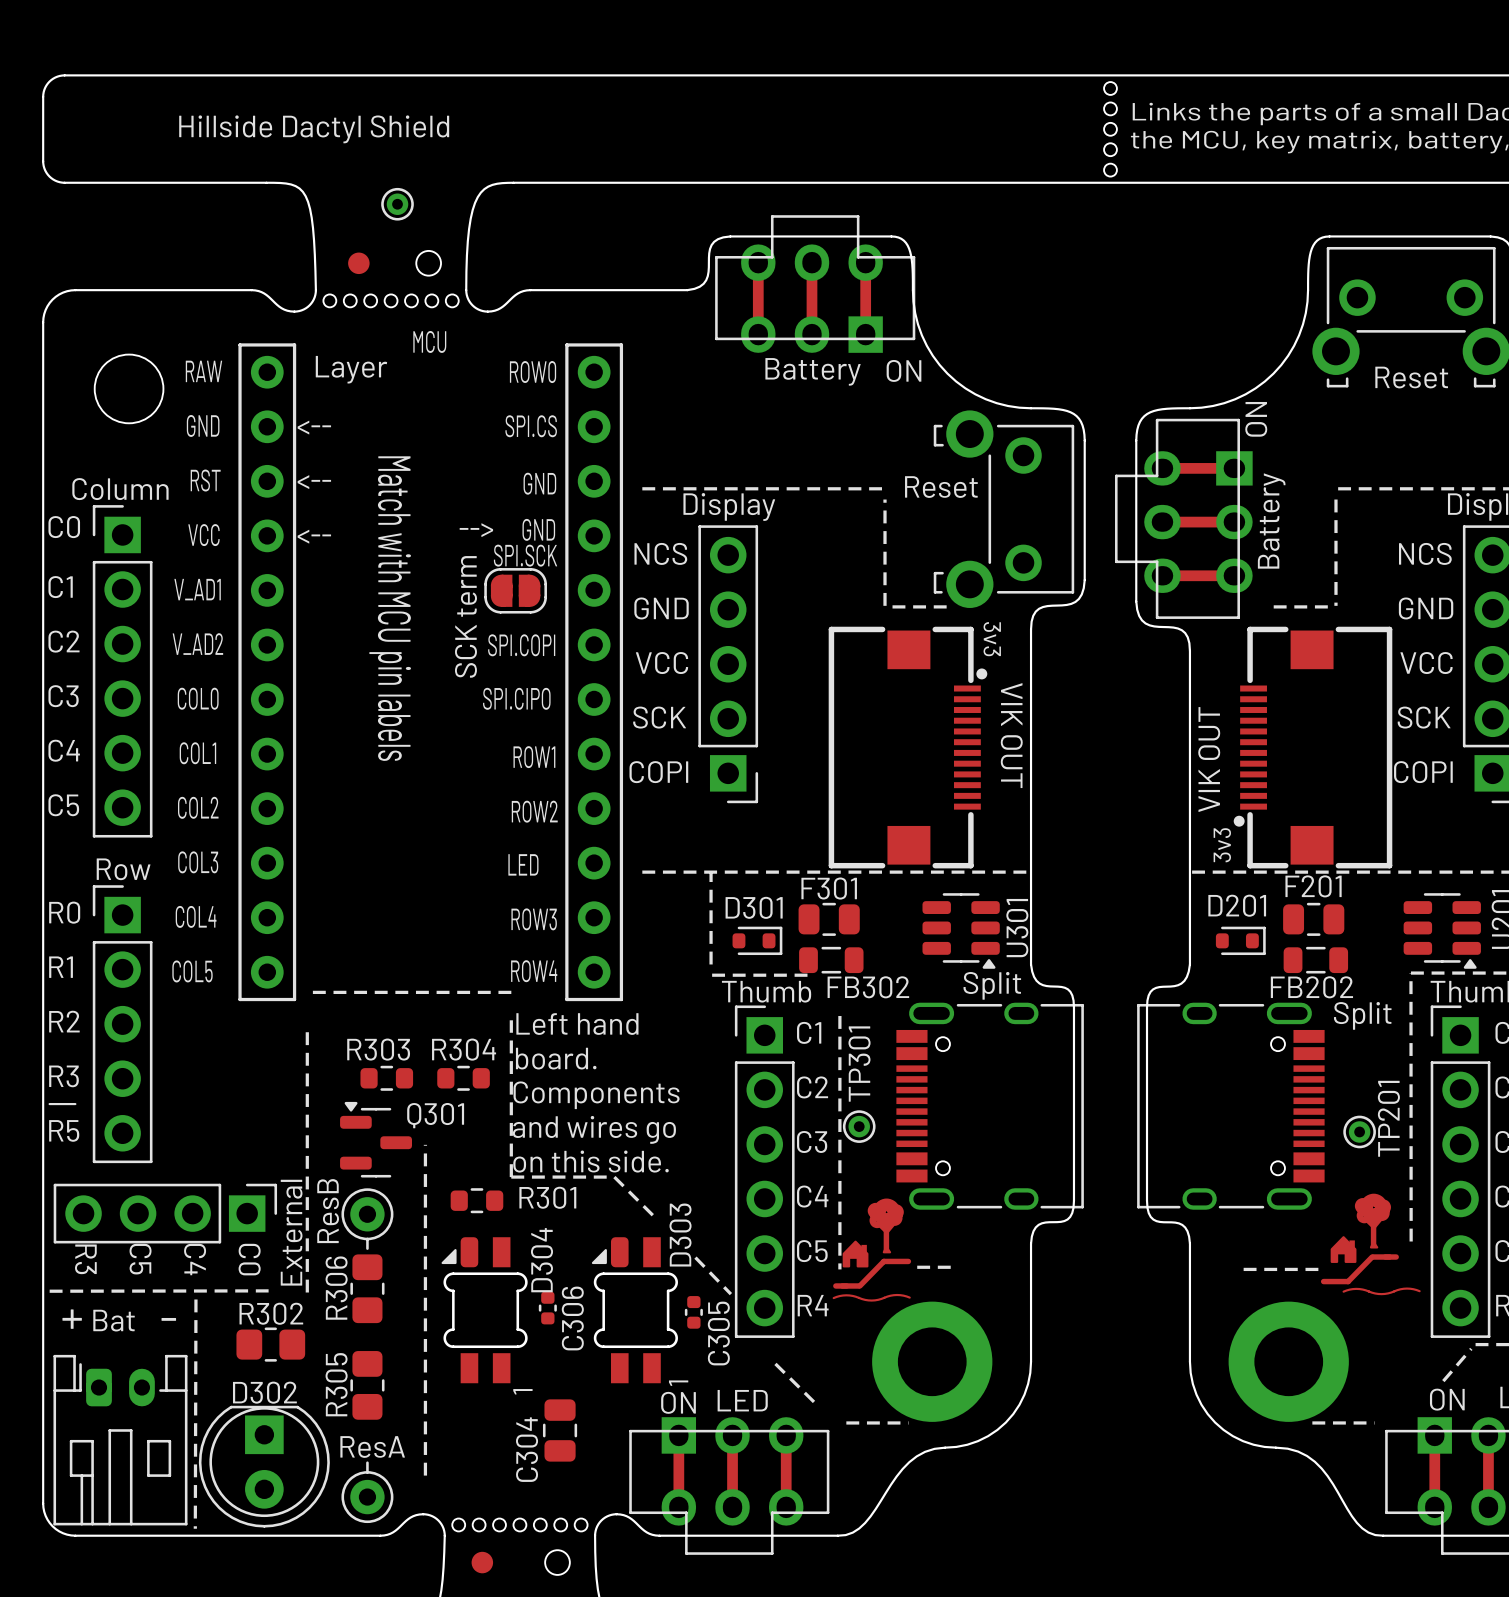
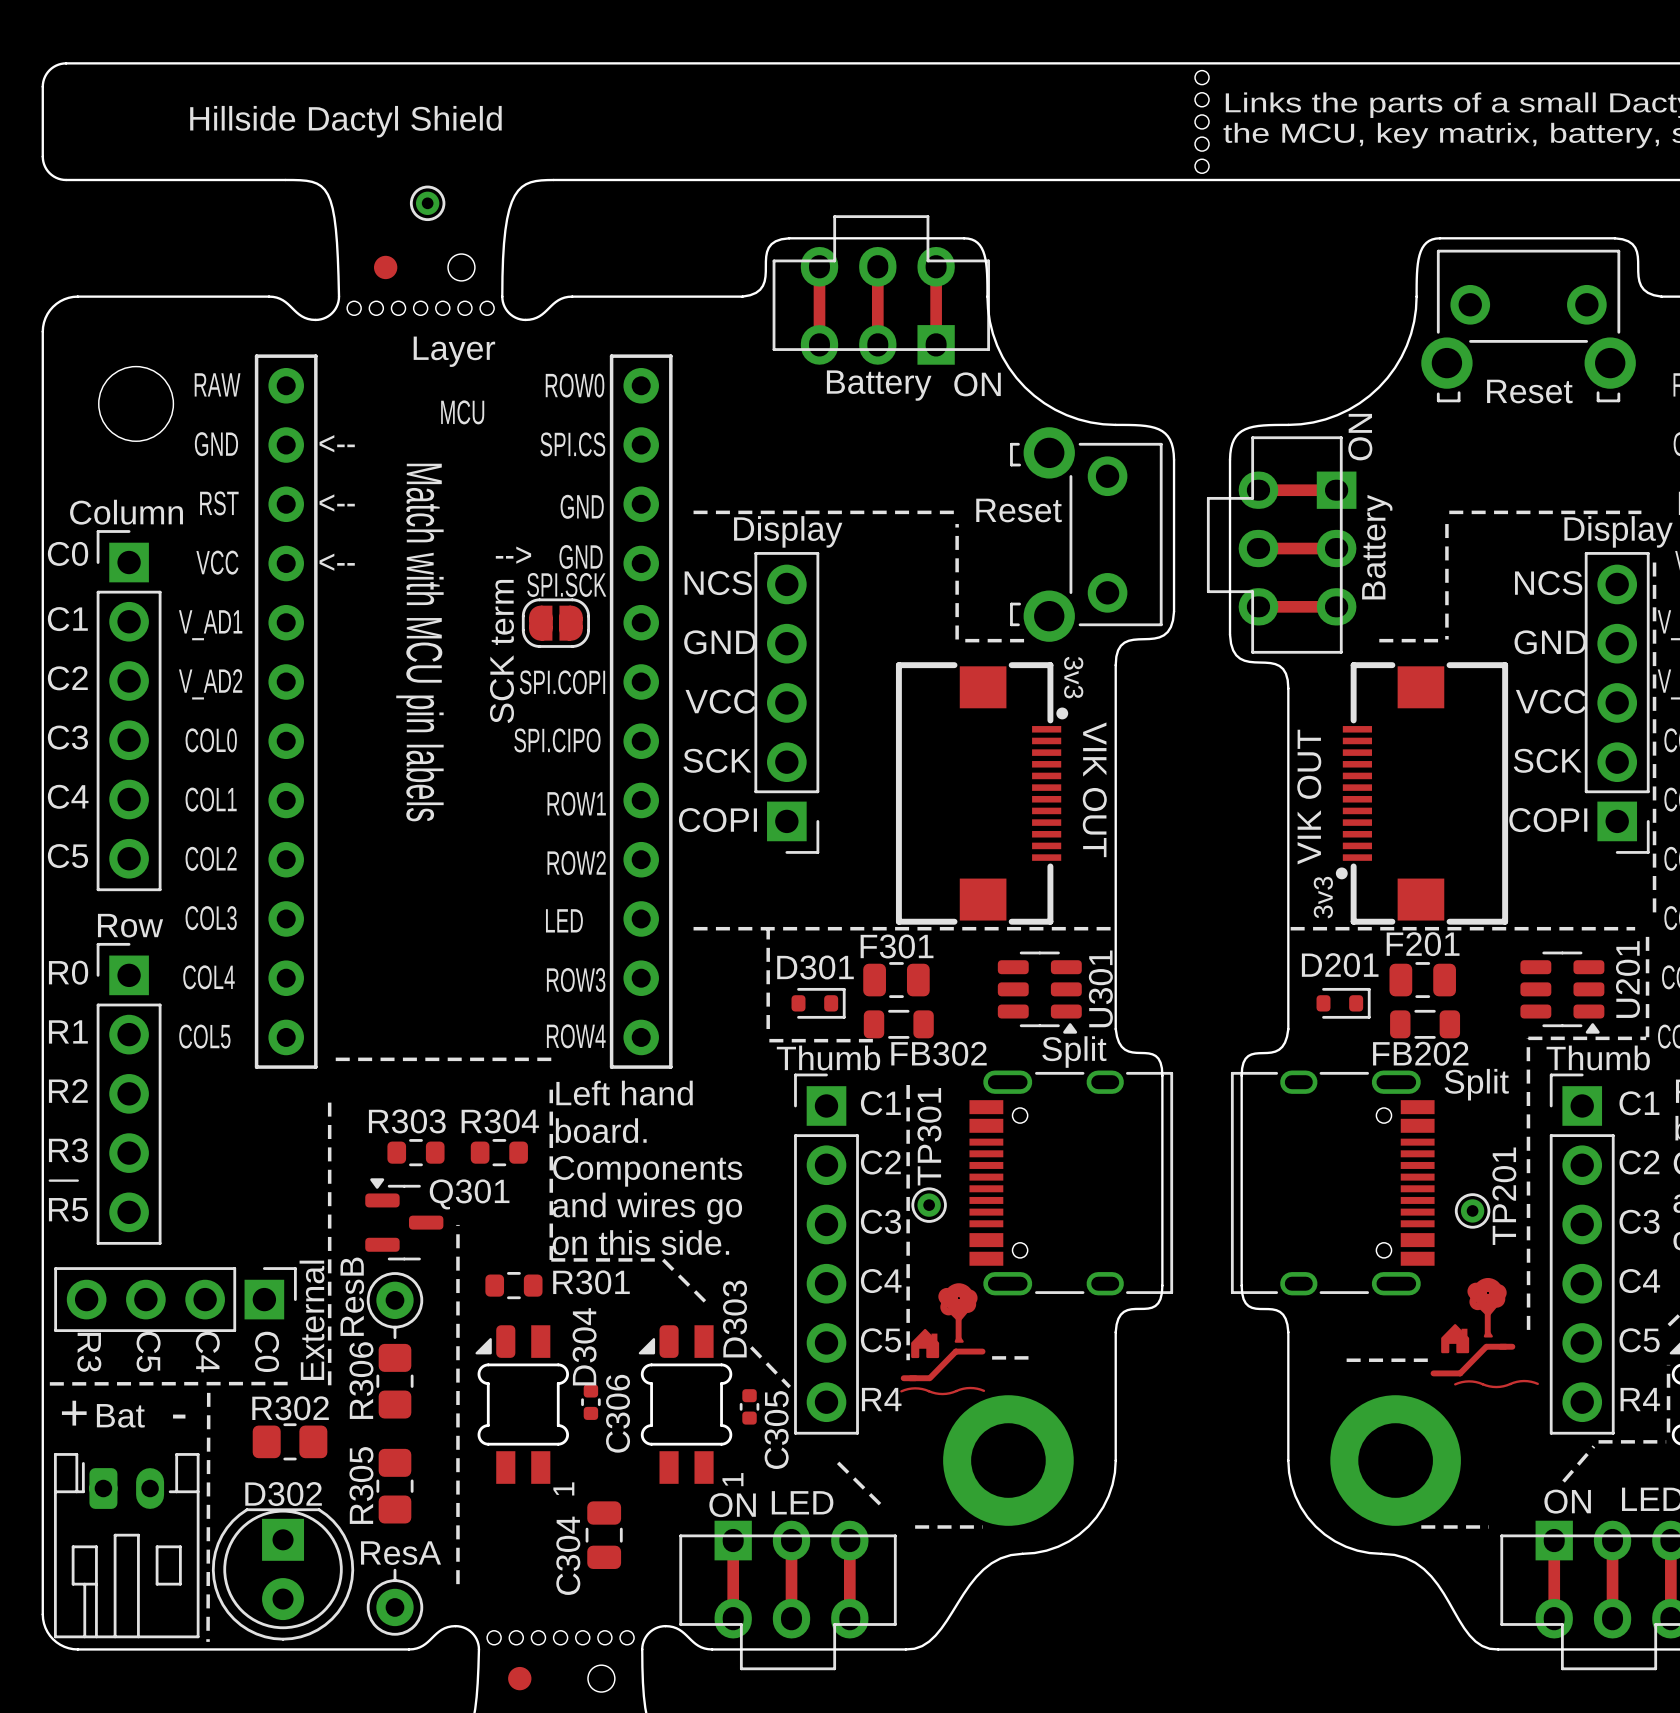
part text position: MCU (429, 341) -> MCU (462, 412)
drawing position: (351, 369) -> (454, 351)

